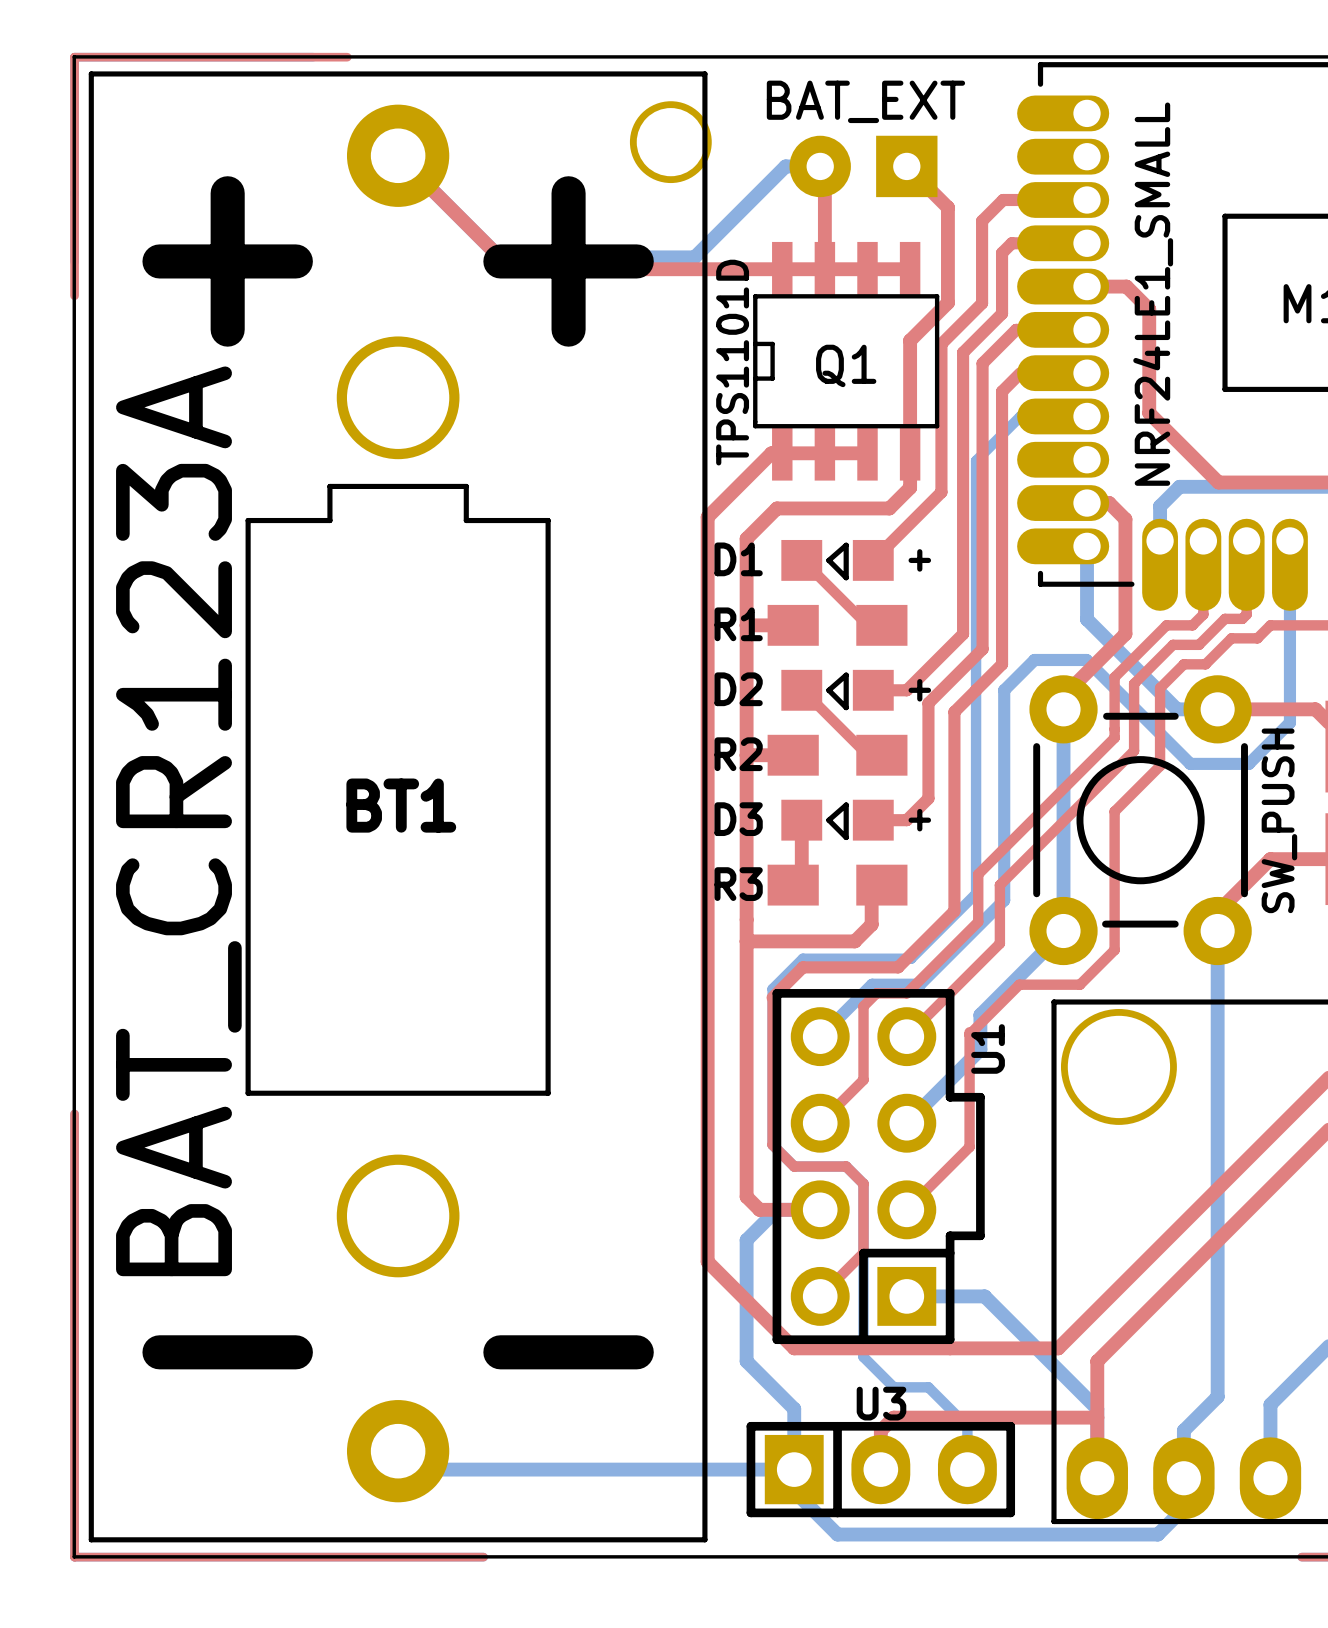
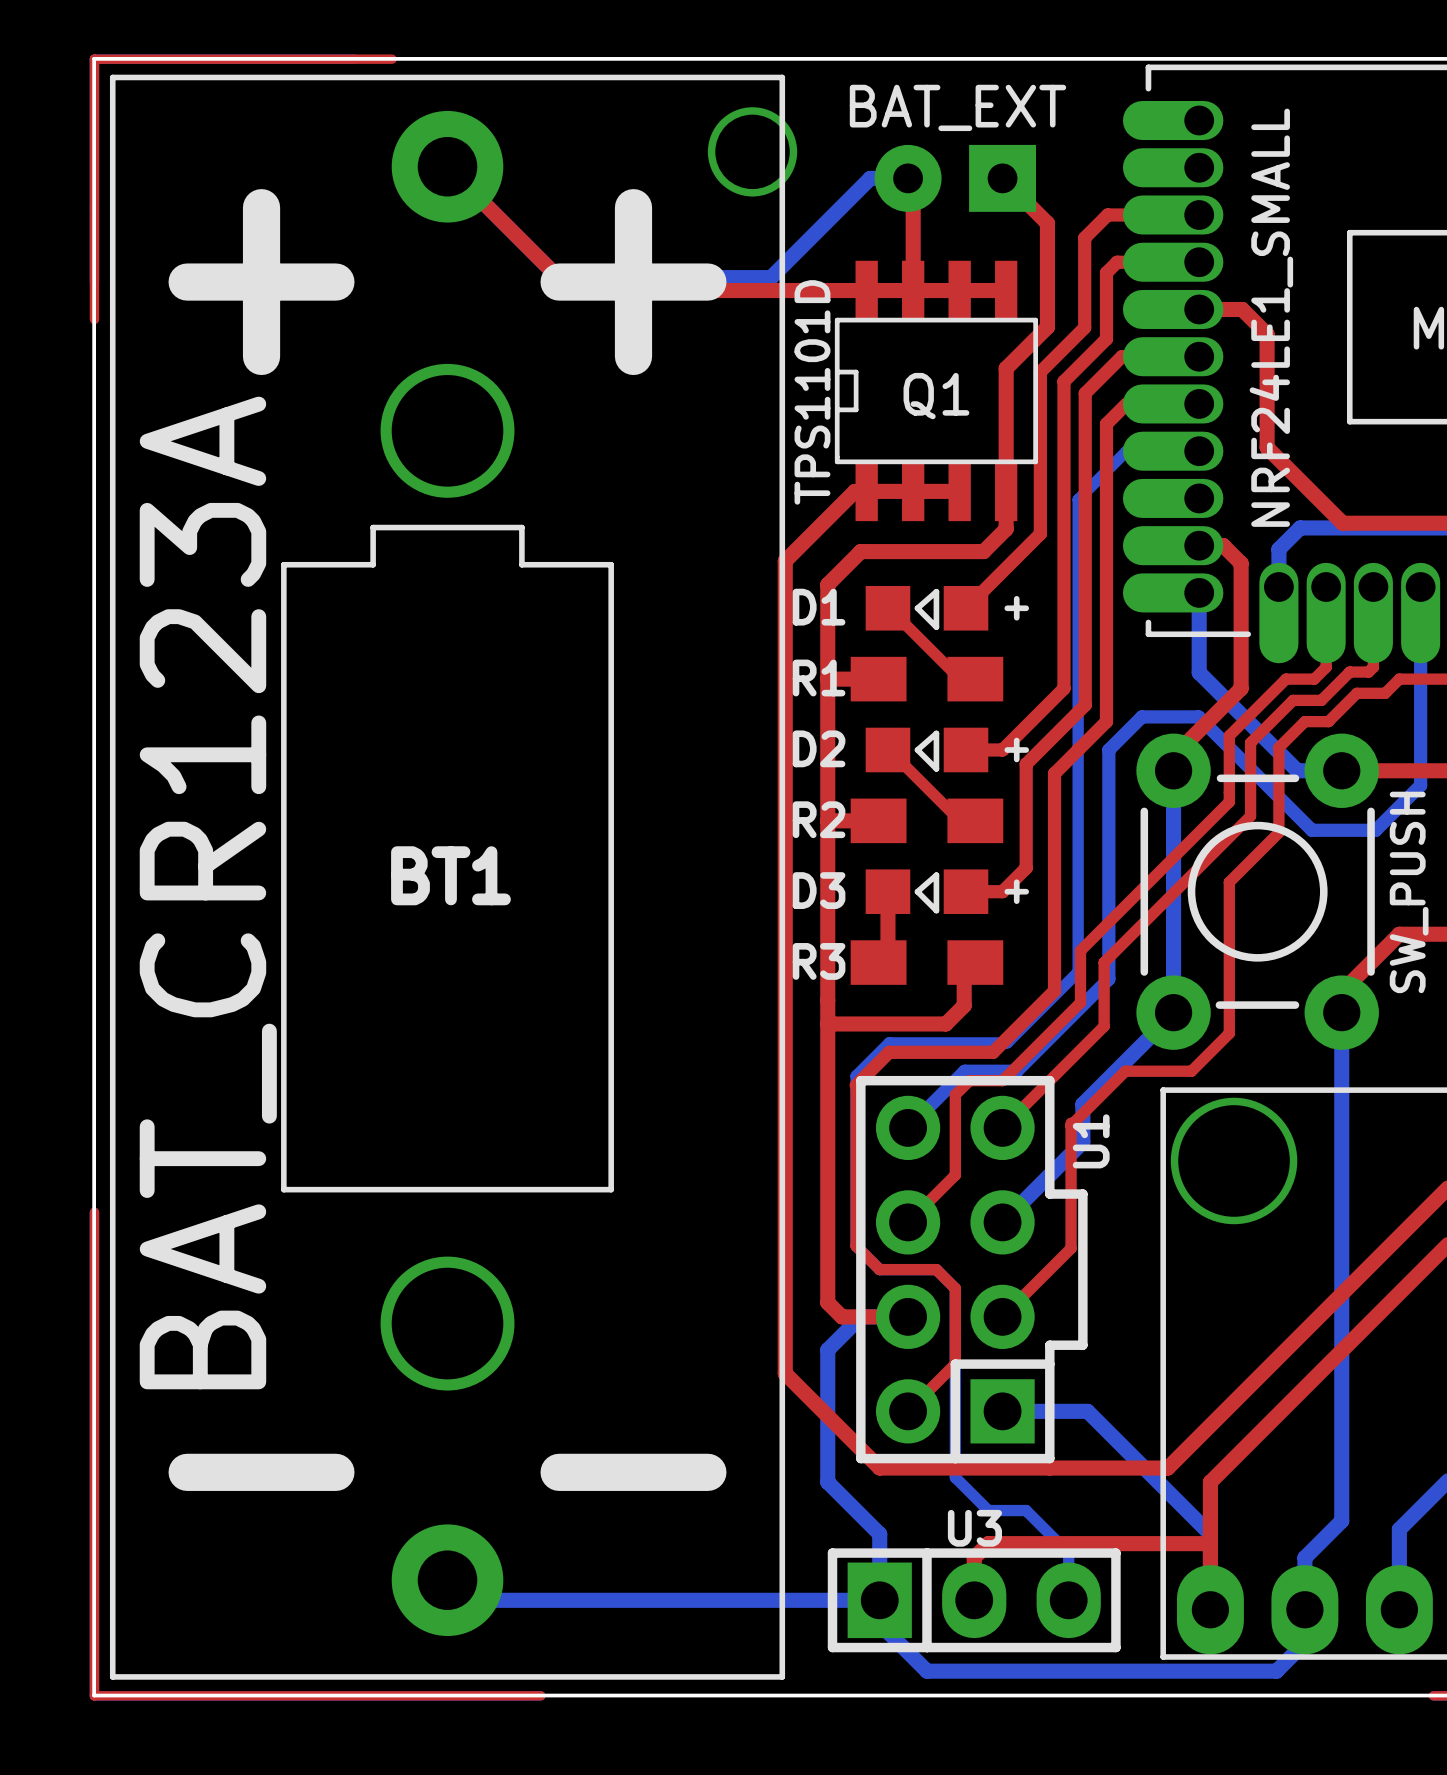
BT1 footprint: [88, 71, 712, 1543] -> [109, 74, 798, 1680]

